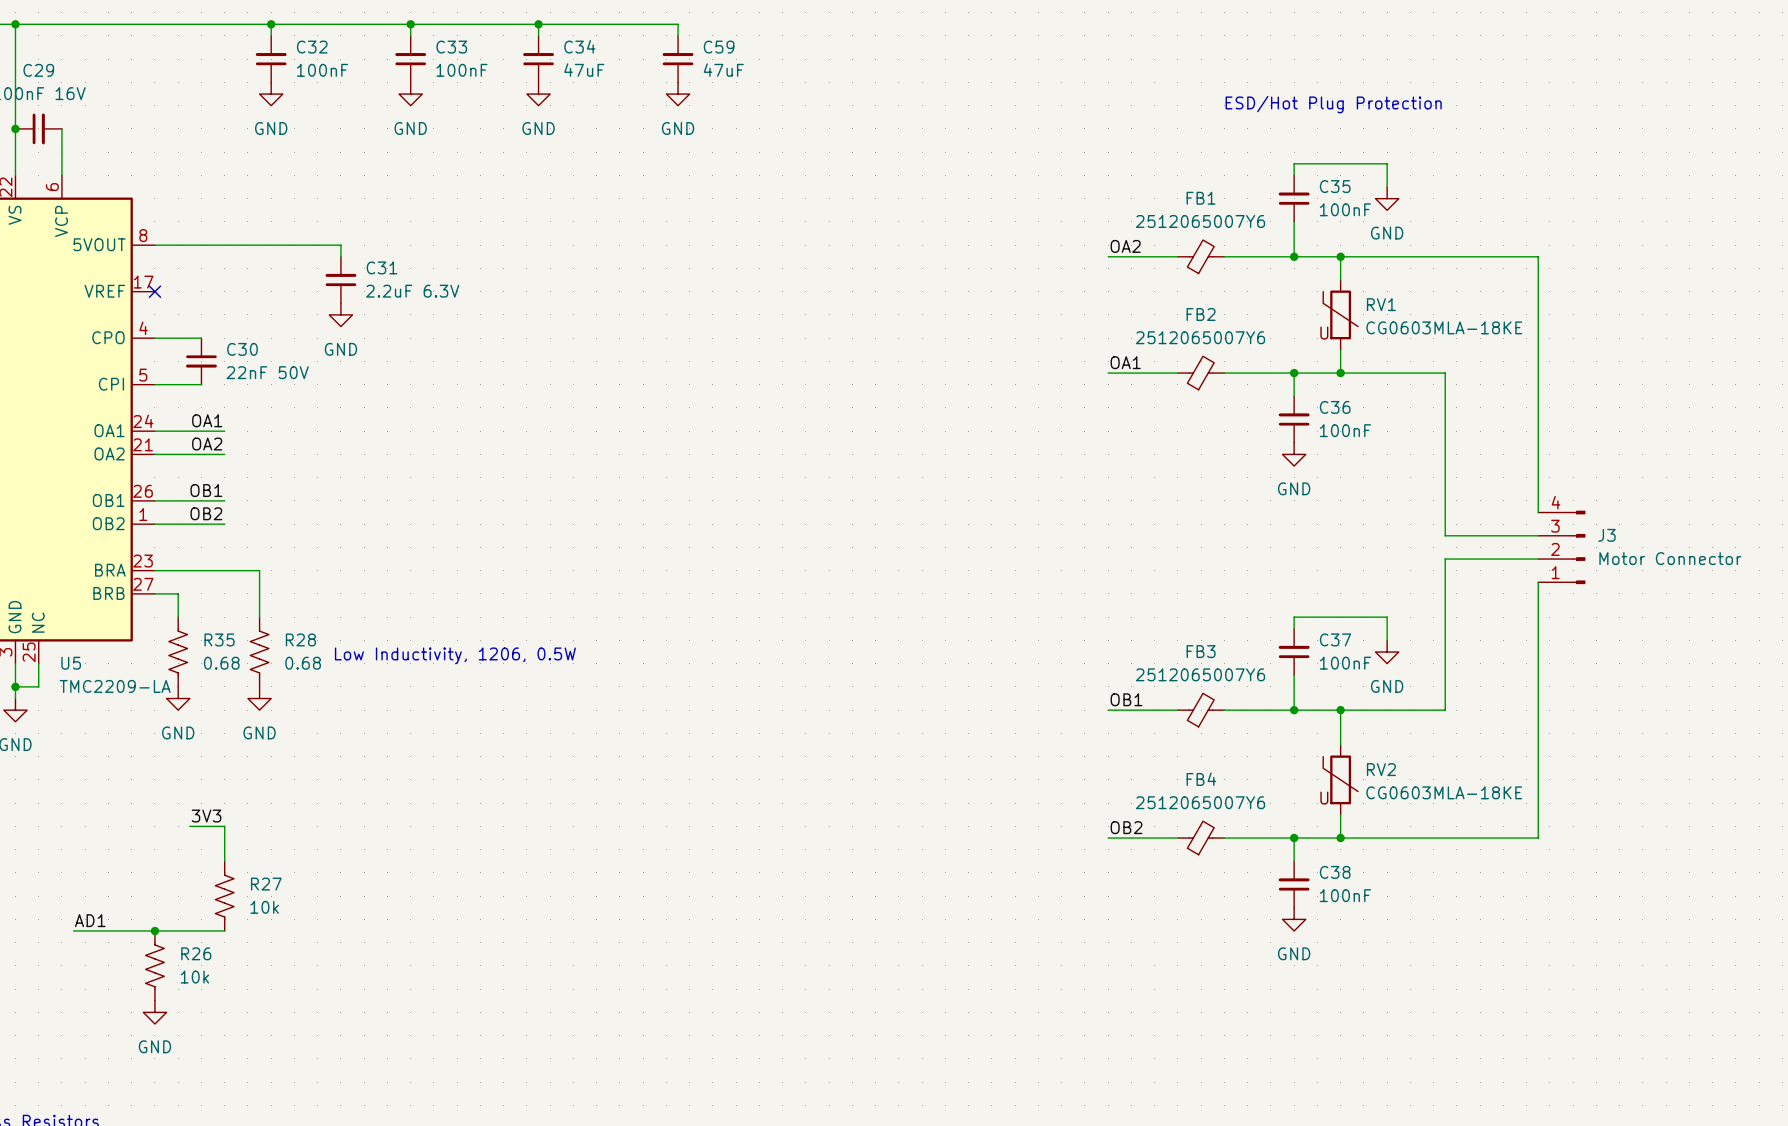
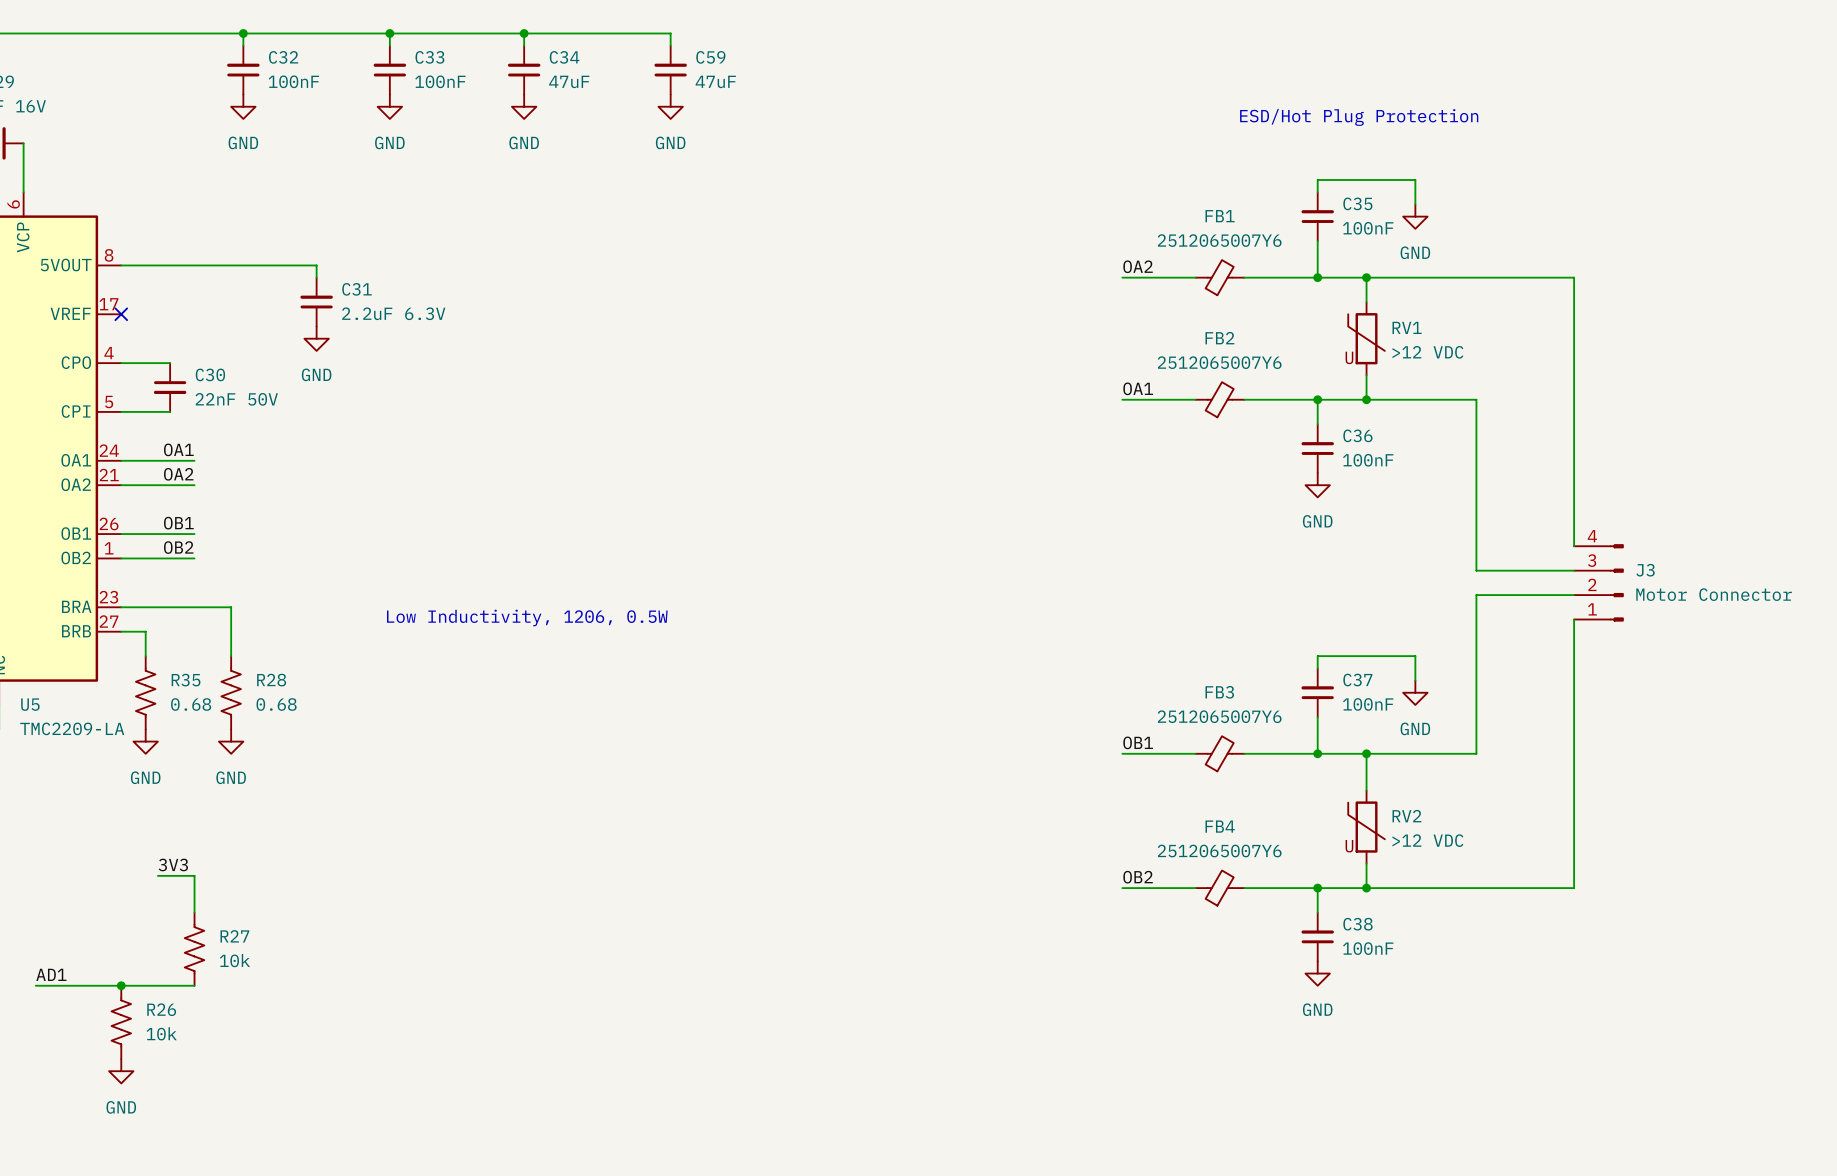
RV1 value: CG0603MLA-18KE (1444, 327) -> >12 VDC (1427, 352)
text position: Low Inductivity, 1206, 0.5W (455, 655) -> Low Inductivity, 1206, 0.5W (527, 617)
RV2 value: CG0603MLA-18KE (1444, 792) -> >12 VDC (1427, 840)

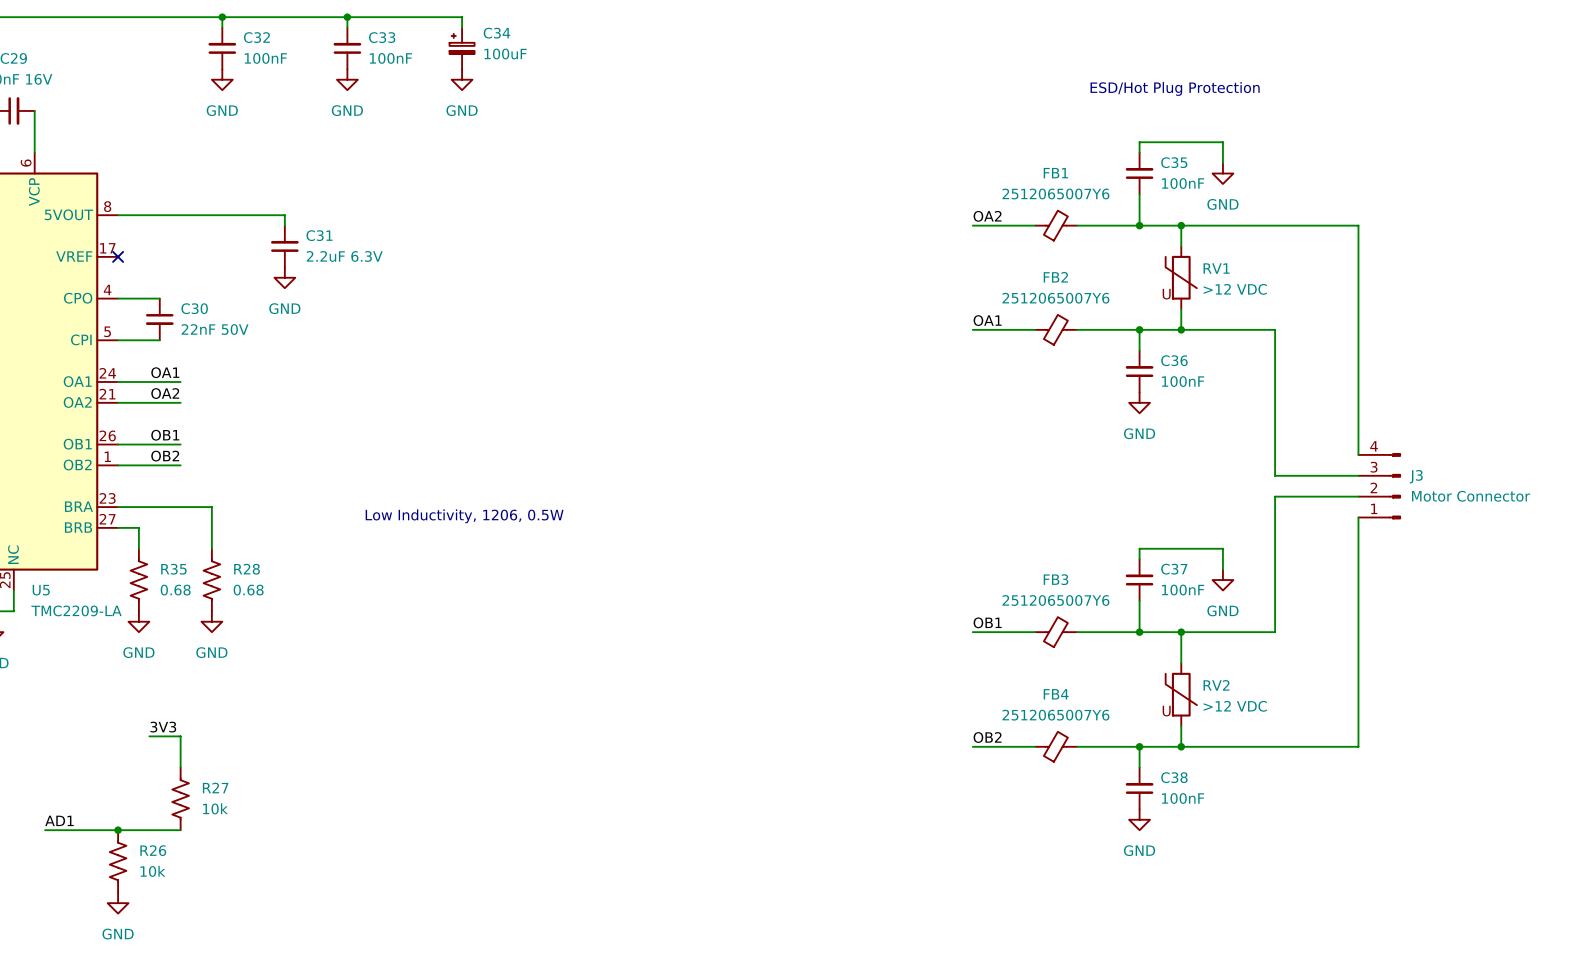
wire: (524, 33) (670, 33) (670, 45) -> none
junction: (524, 33) -> none
C34 symbol: [507, 45, 541, 95] -> [449, 27, 475, 70]
C59: 47uF (670, 70) -> none
C34 value: 47uF (569, 81) -> 100uF (505, 54)
power symbol: GND (670, 106) -> none

